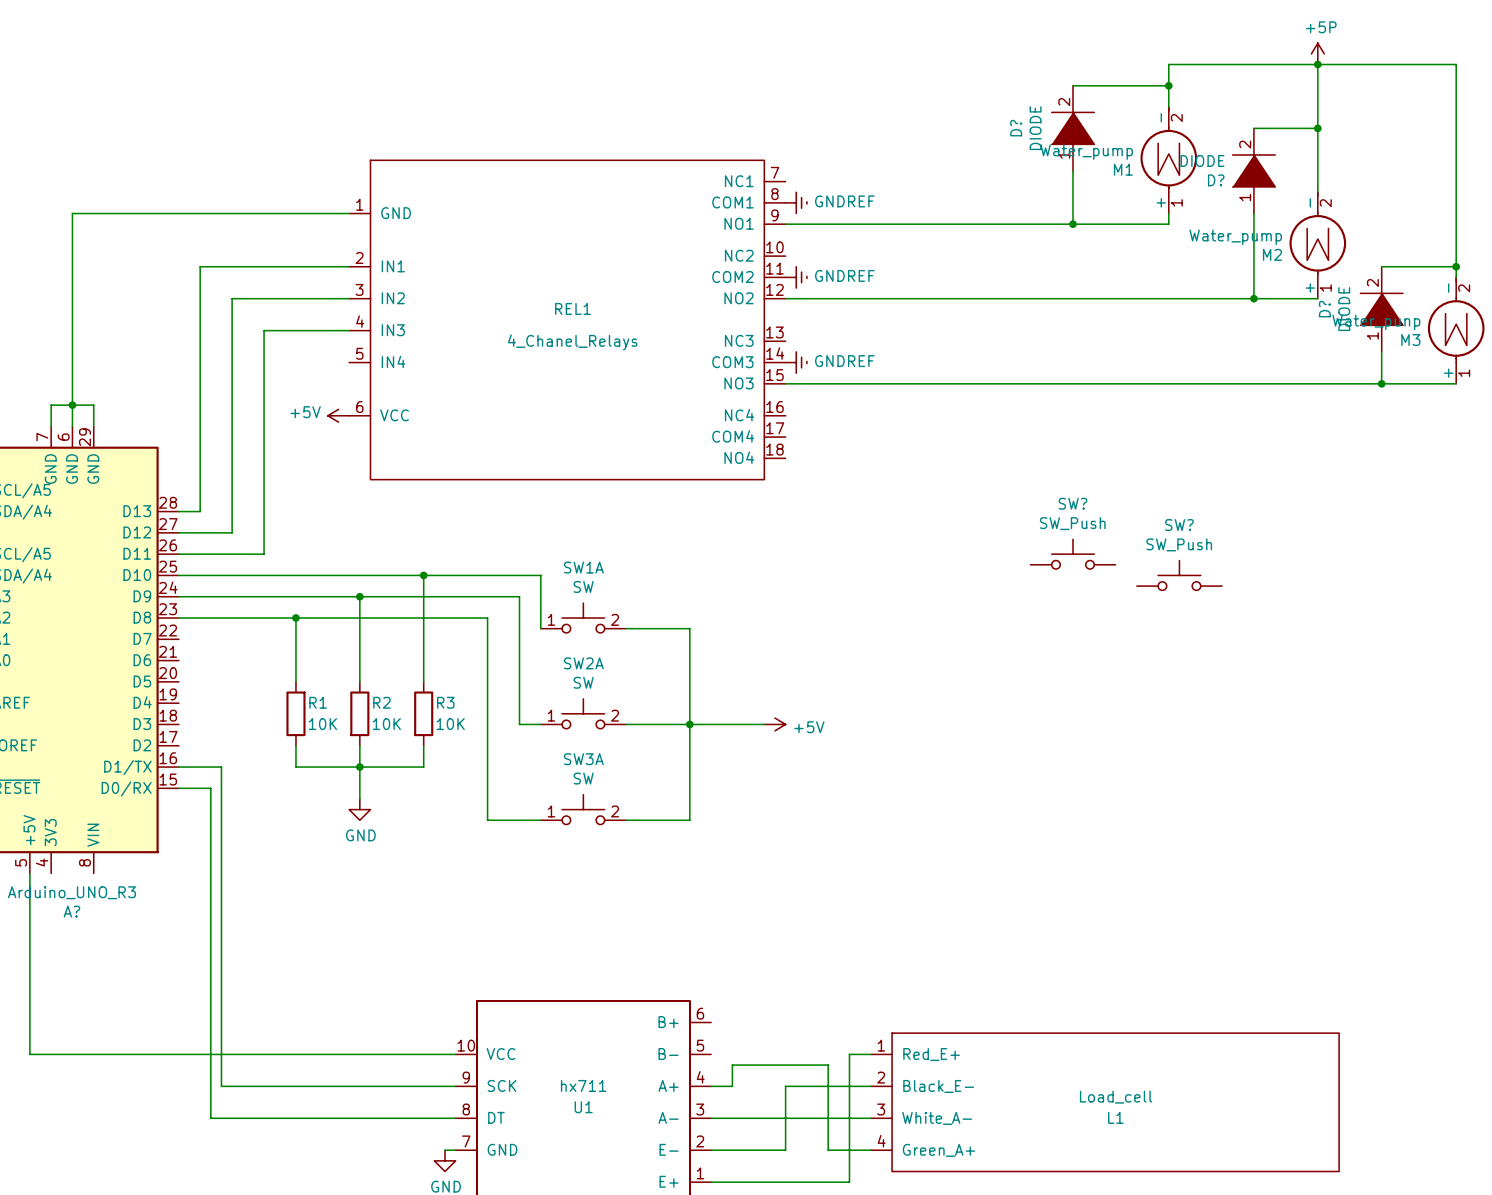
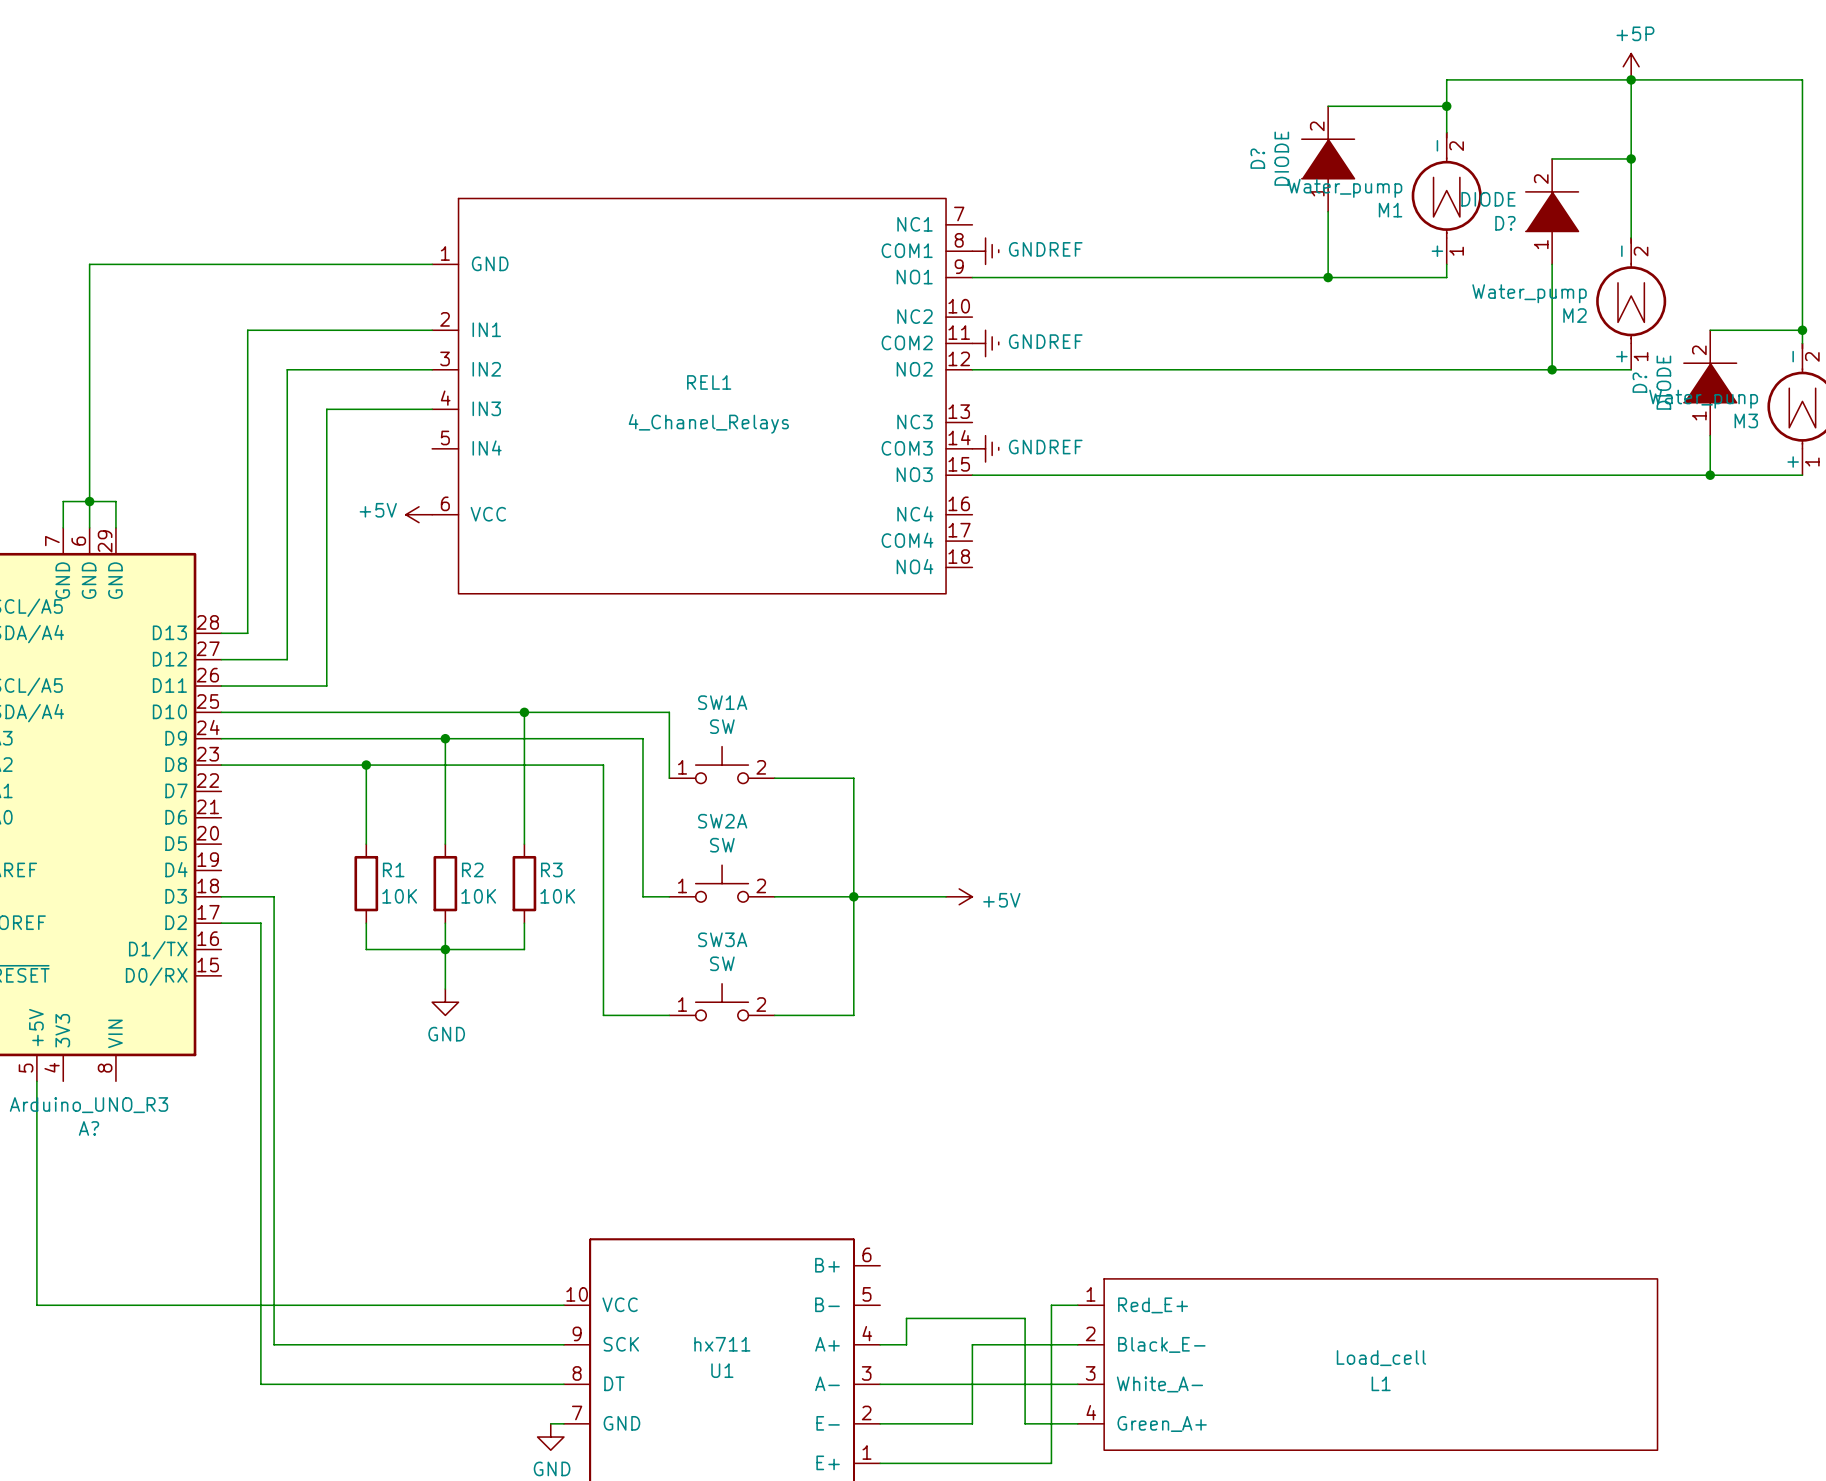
SW?: SW_Push (1073, 554) -> none
SW?: SW_Push (1179, 575) -> none
wire: (178, 767) (221, 767) -> (221, 896) (274, 896) (274, 949)
wire: (178, 788) (210, 788) -> (221, 923) (260, 923) (260, 975)

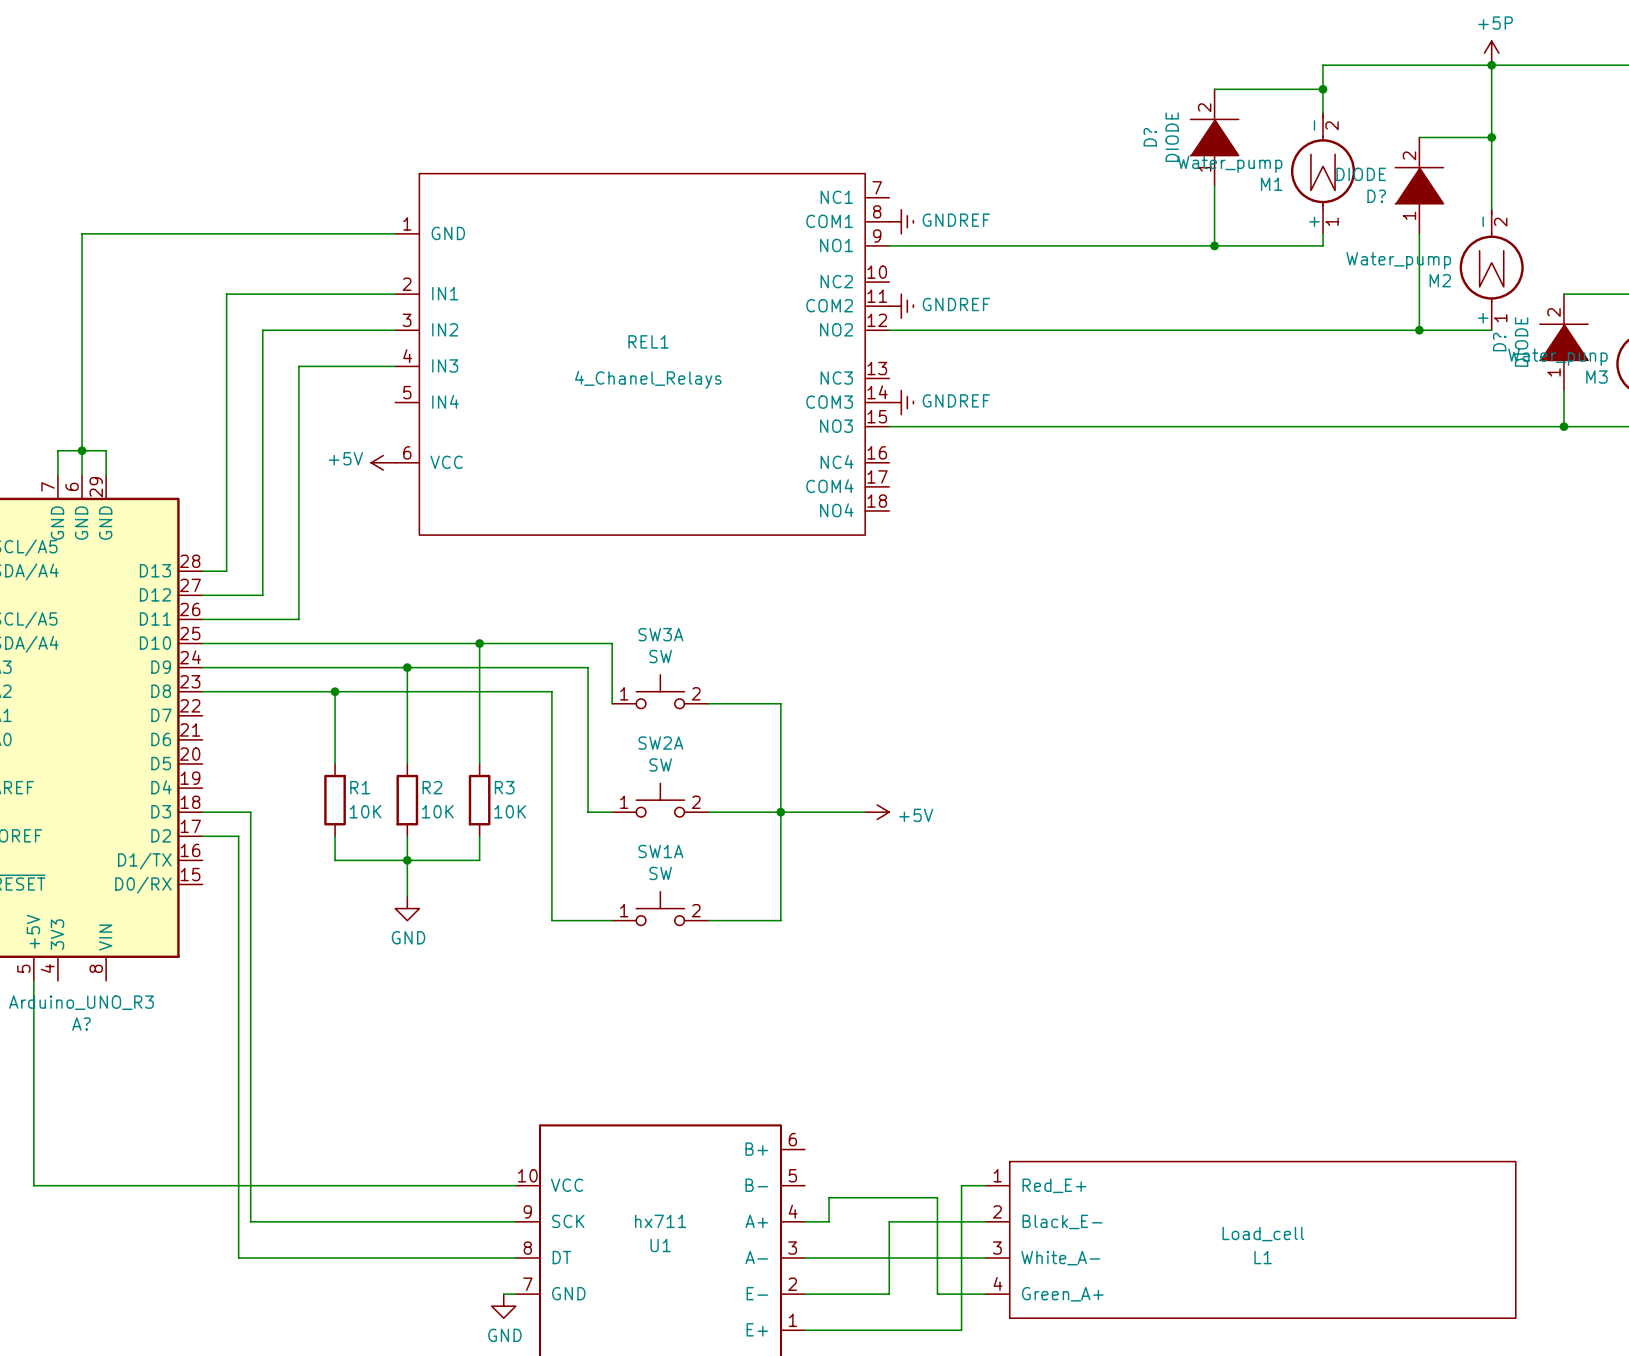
SW1A name: SW1A (722, 702) -> SW3A (660, 634)
SW3A name: SW3A (722, 939) -> SW1A (660, 851)

